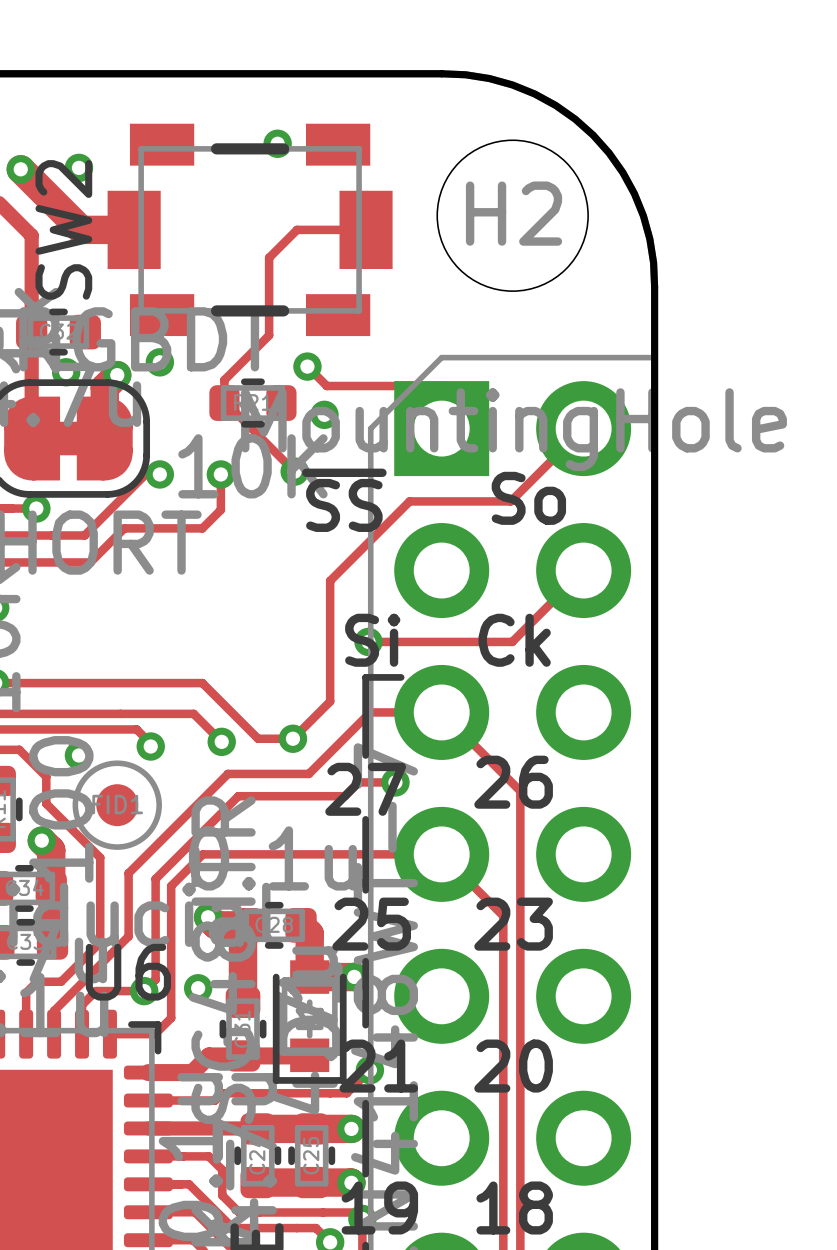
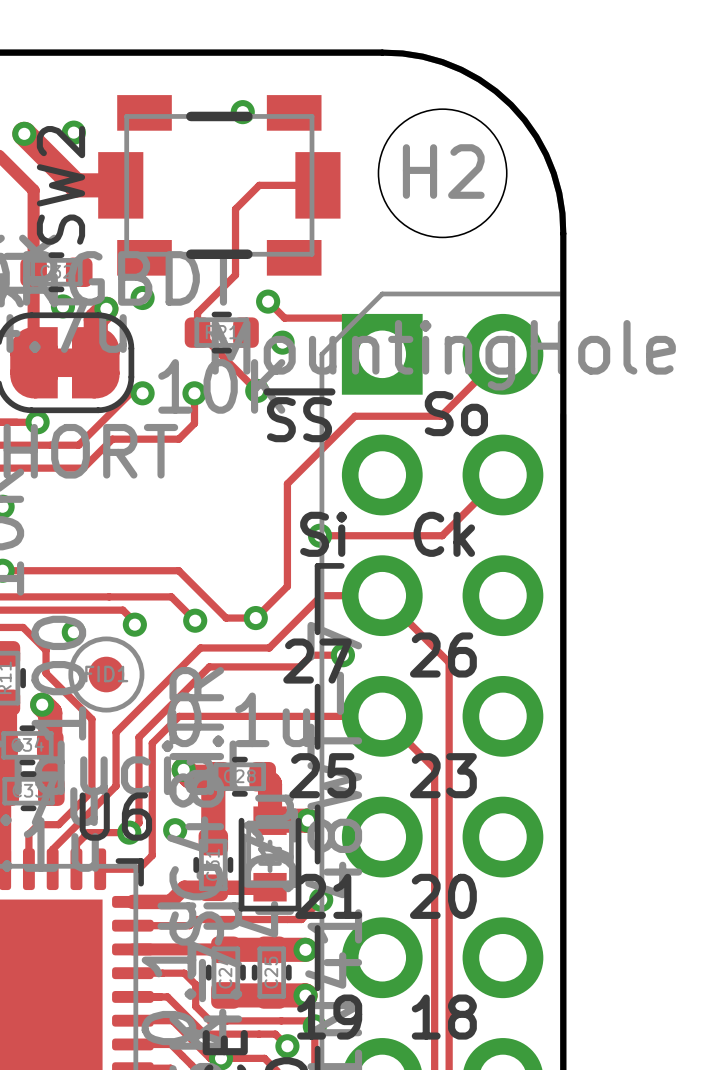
line: (394, 677) (401, 677) -> none

